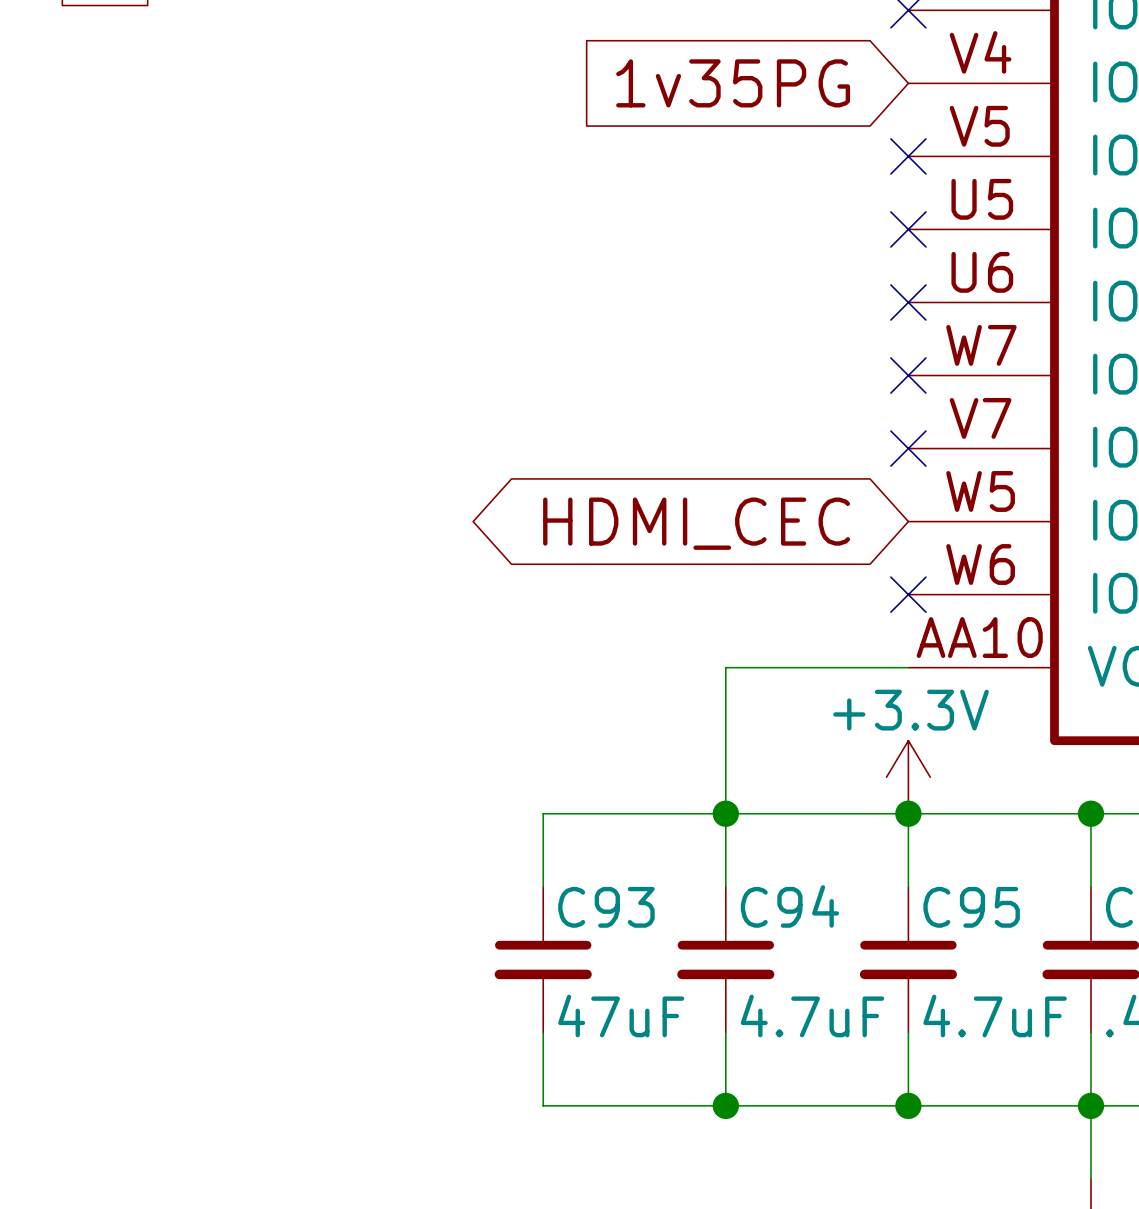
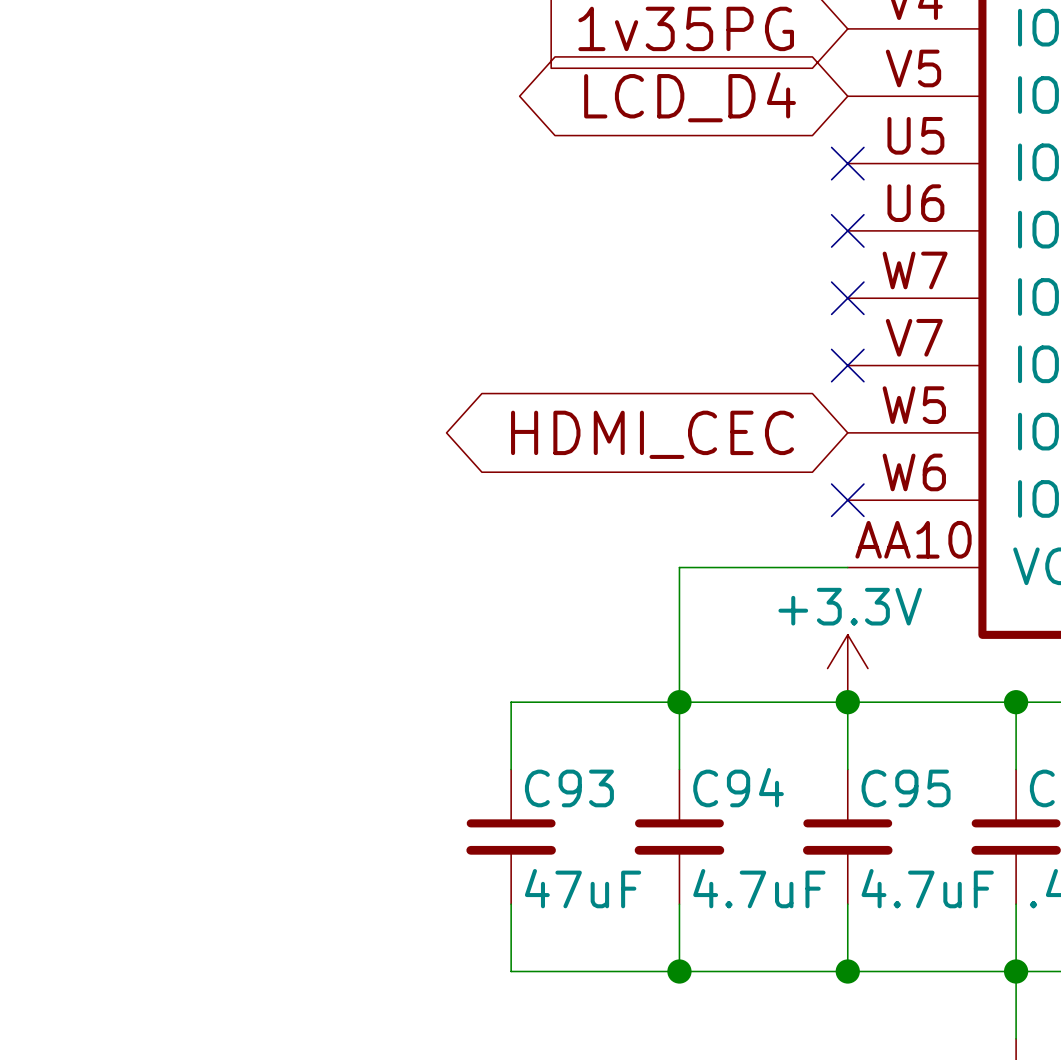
no-connect mark: (908, 156) -> none
global label: none -> LCD_D4 (690, 97)

